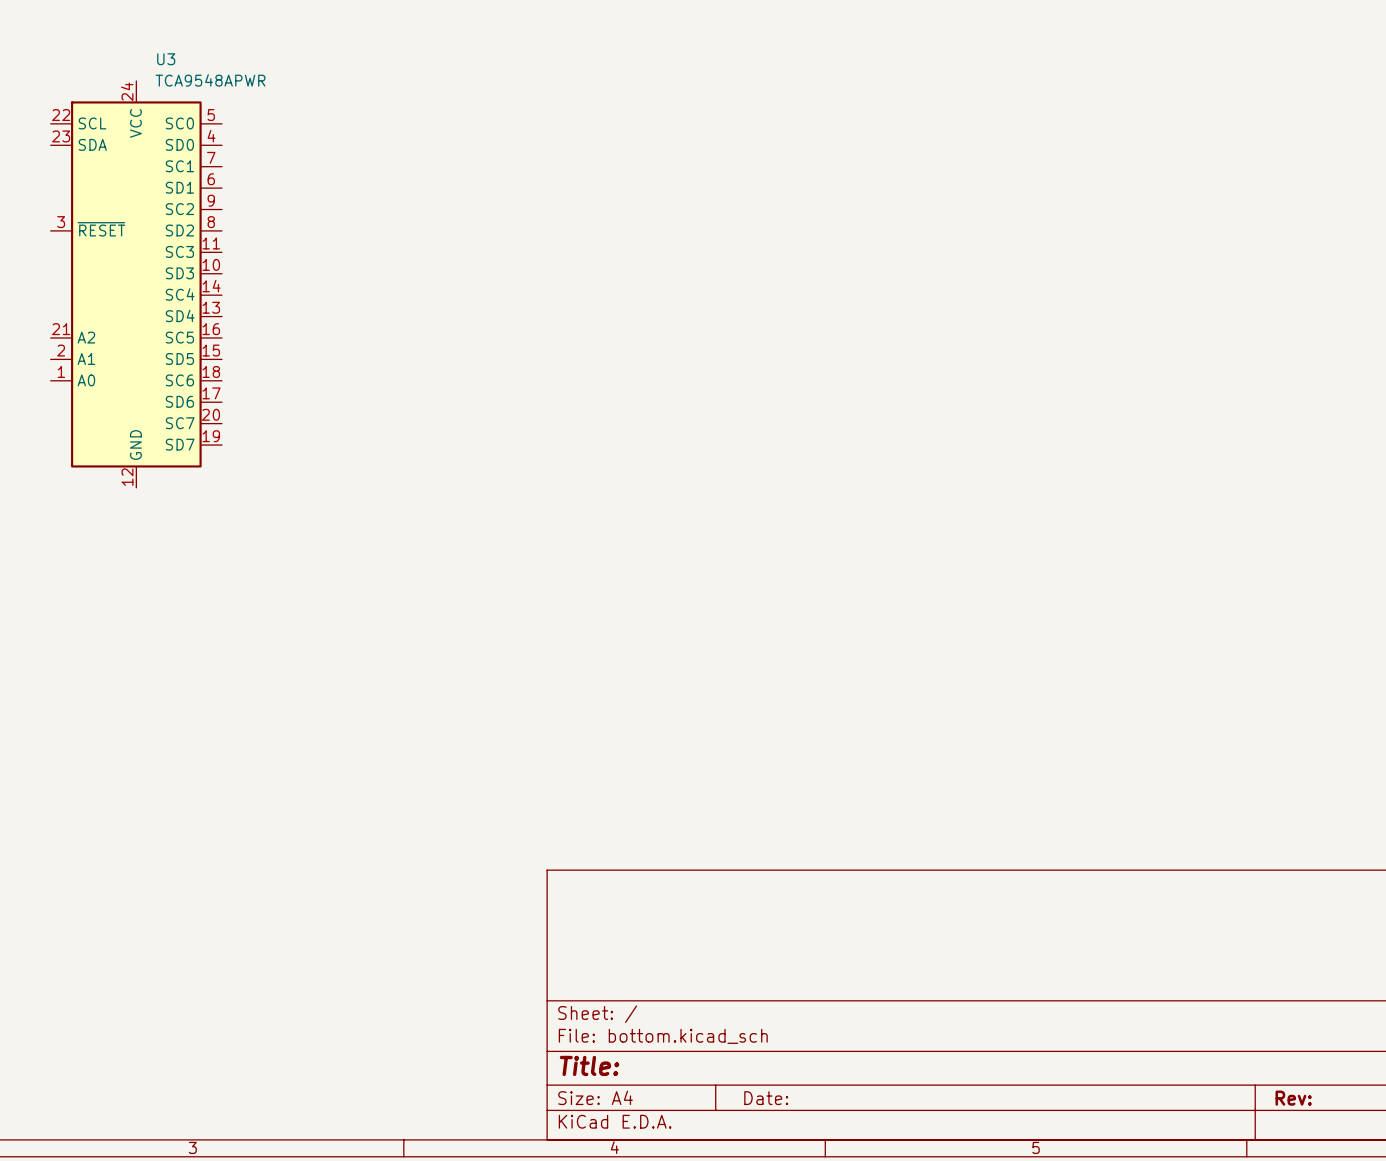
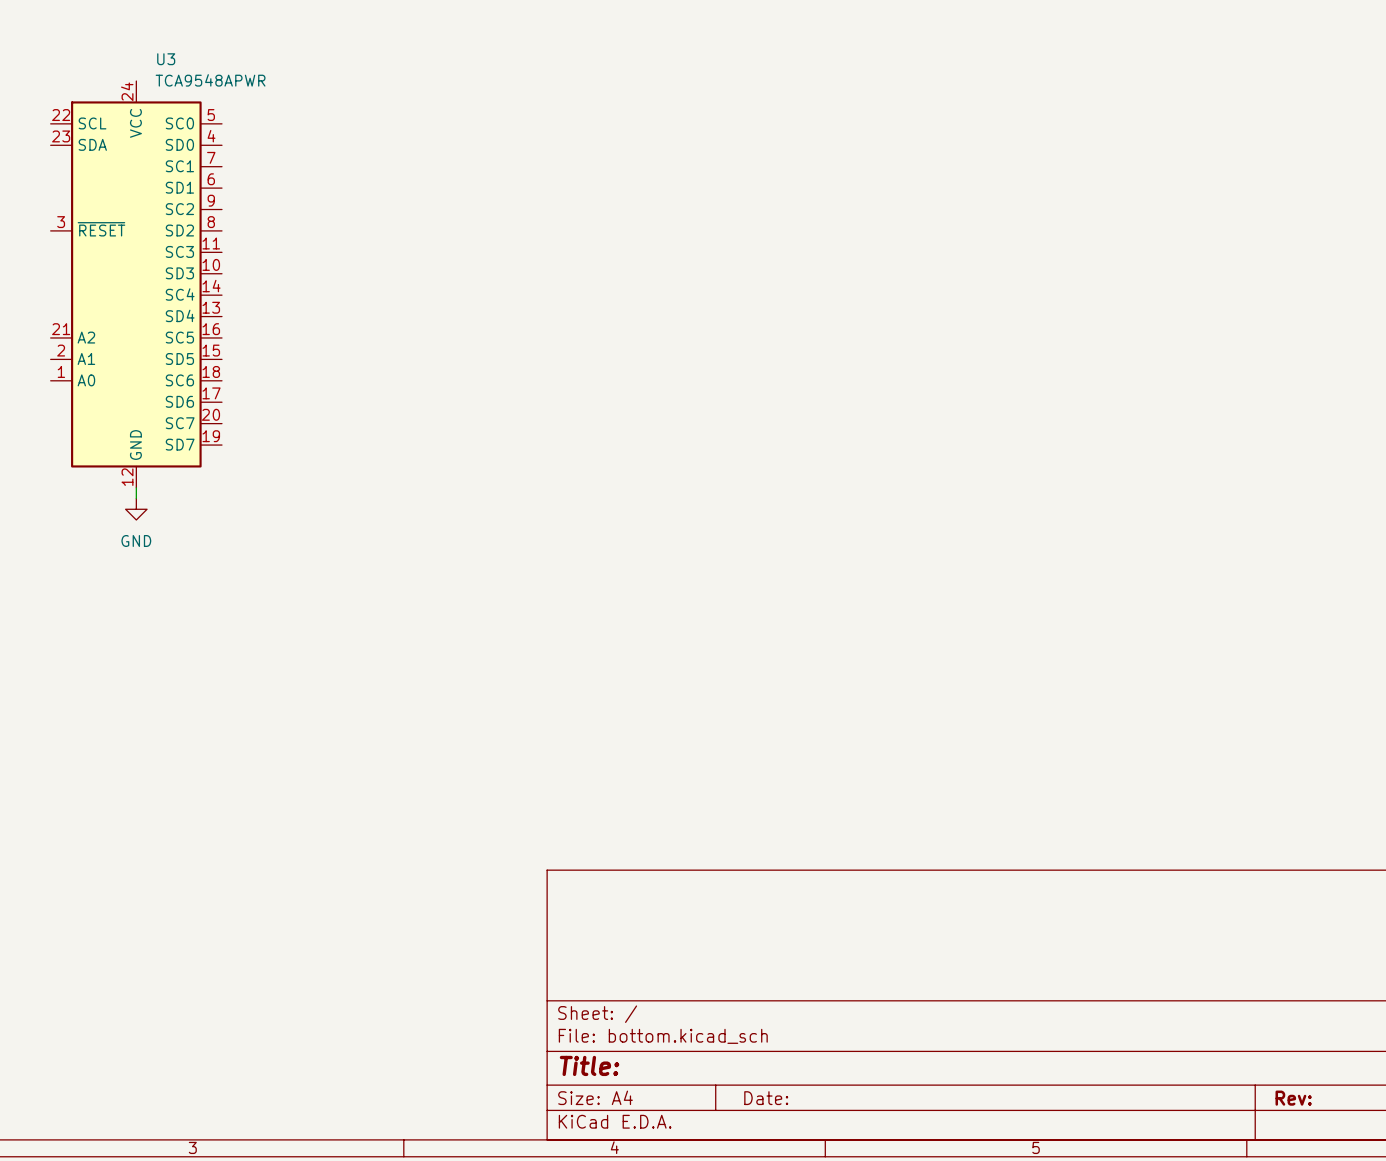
wire: none -> (136, 487) (136, 498)
power symbol: none -> GND (136, 509)

